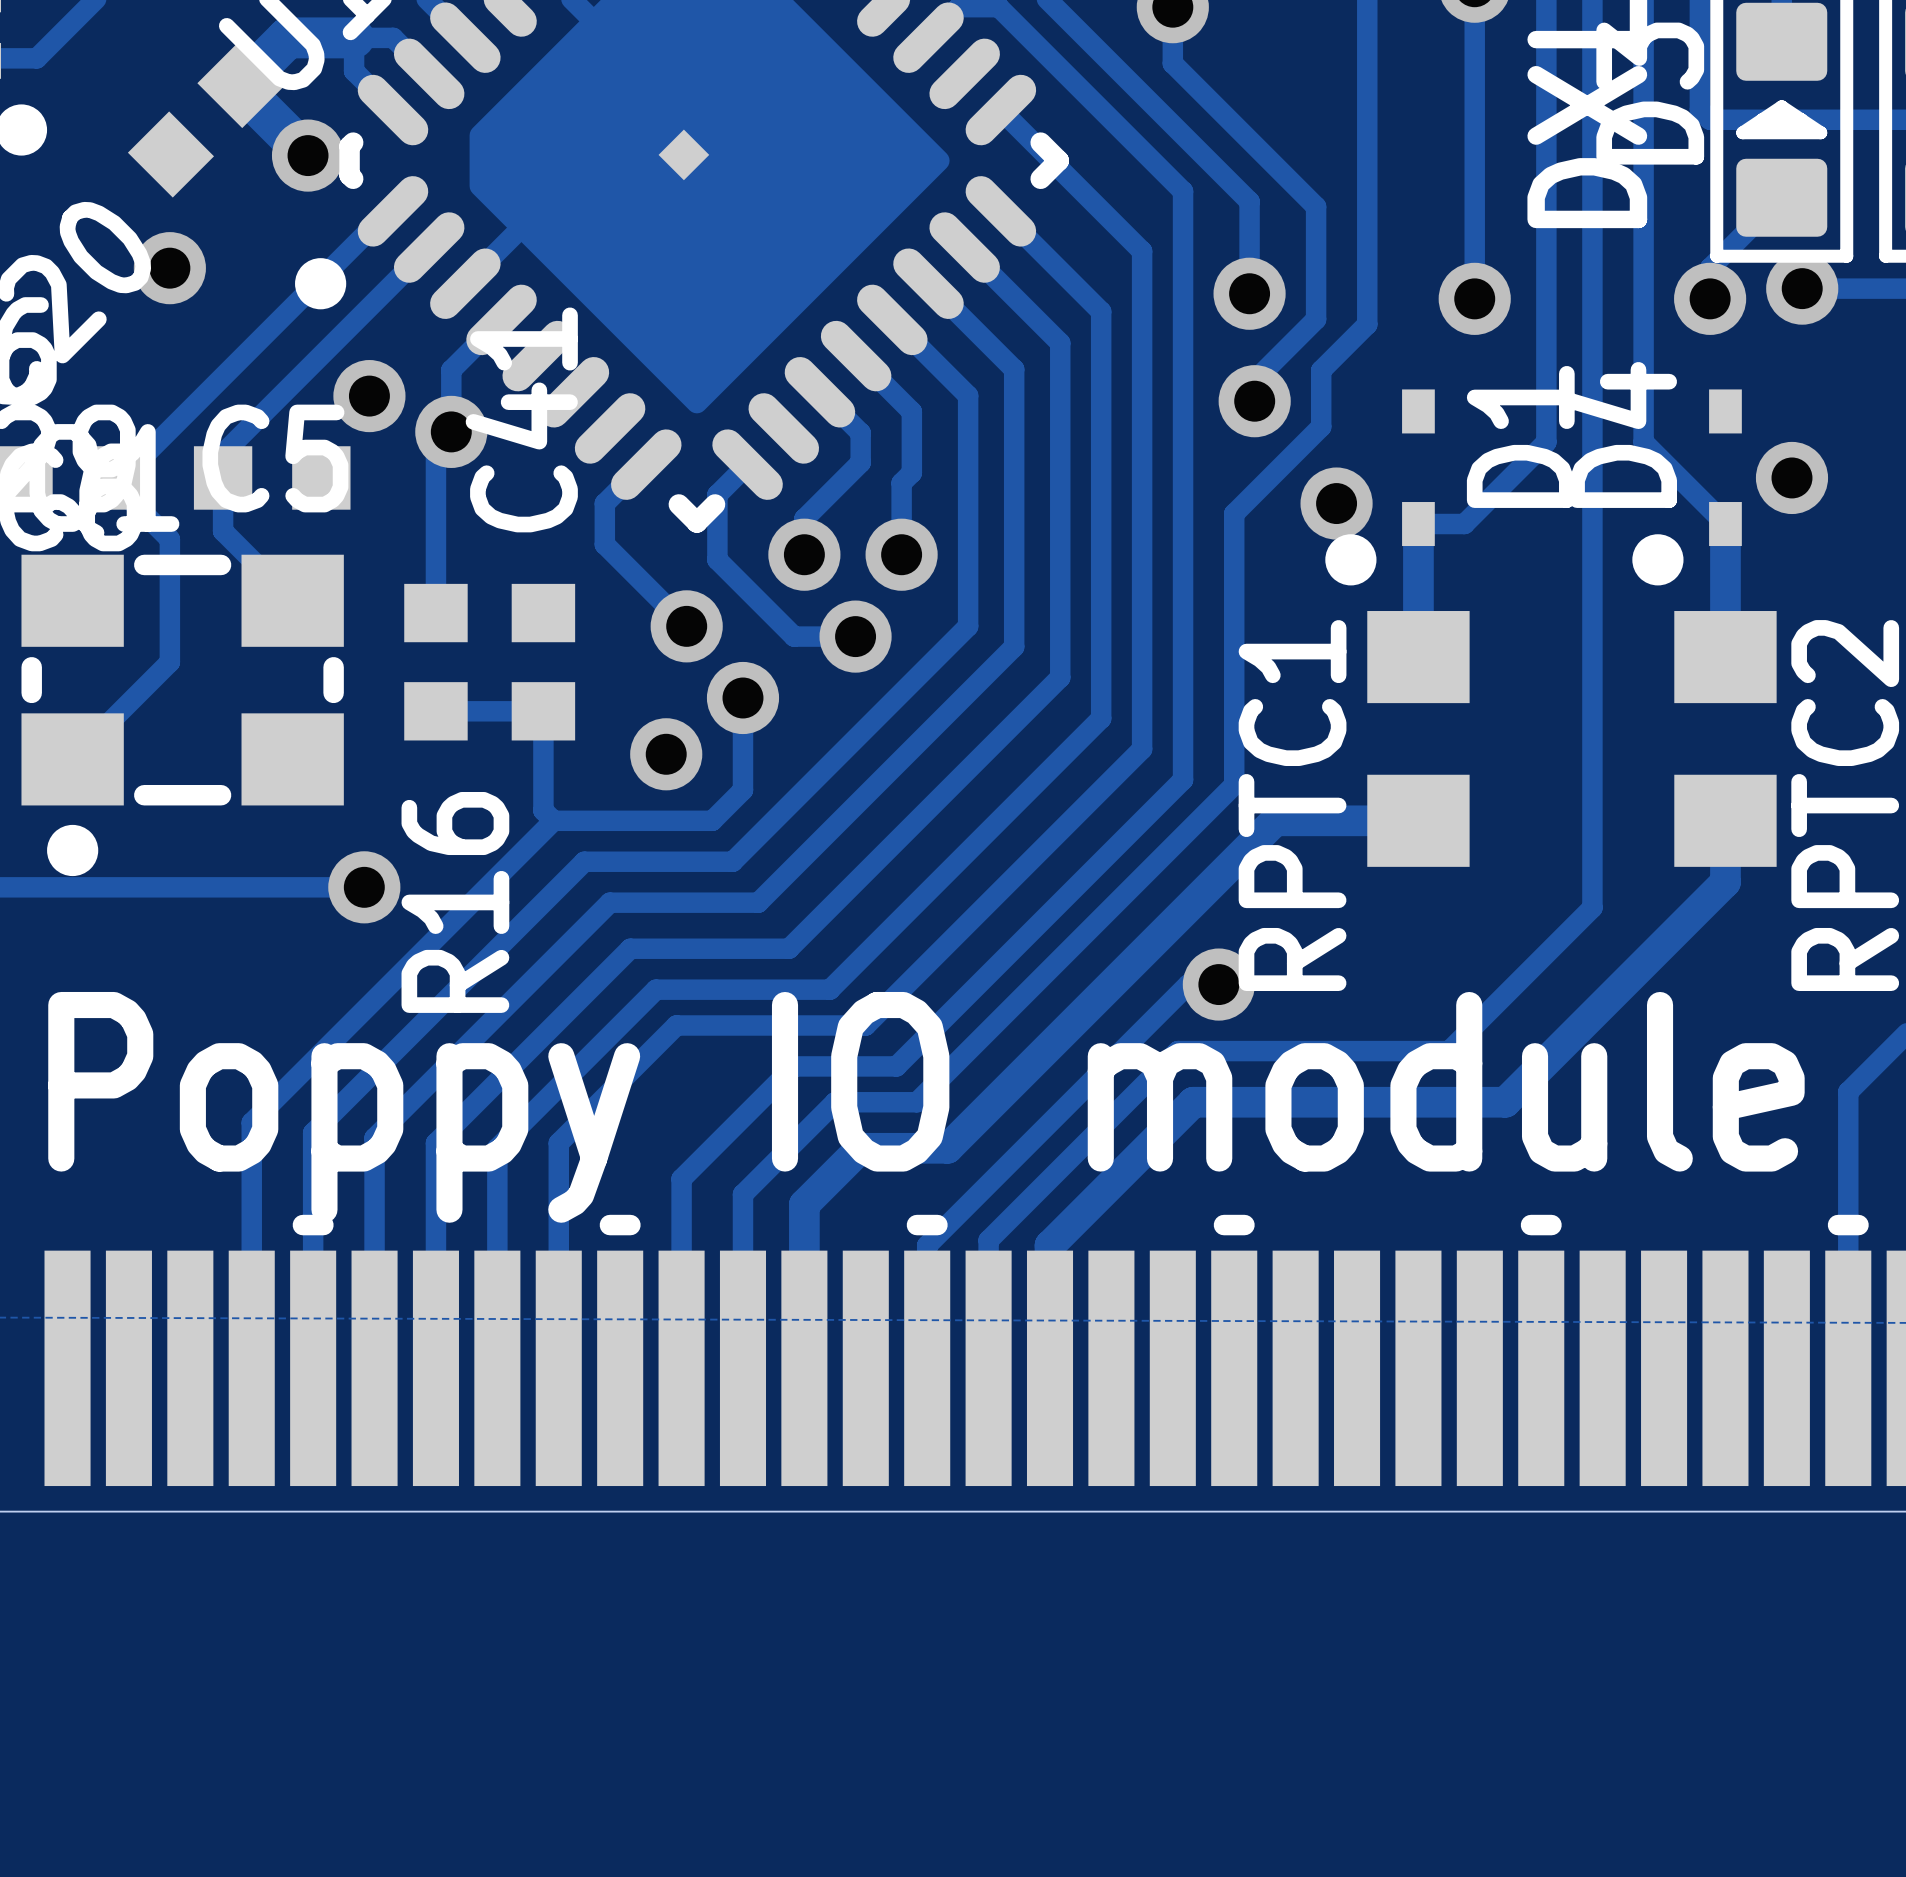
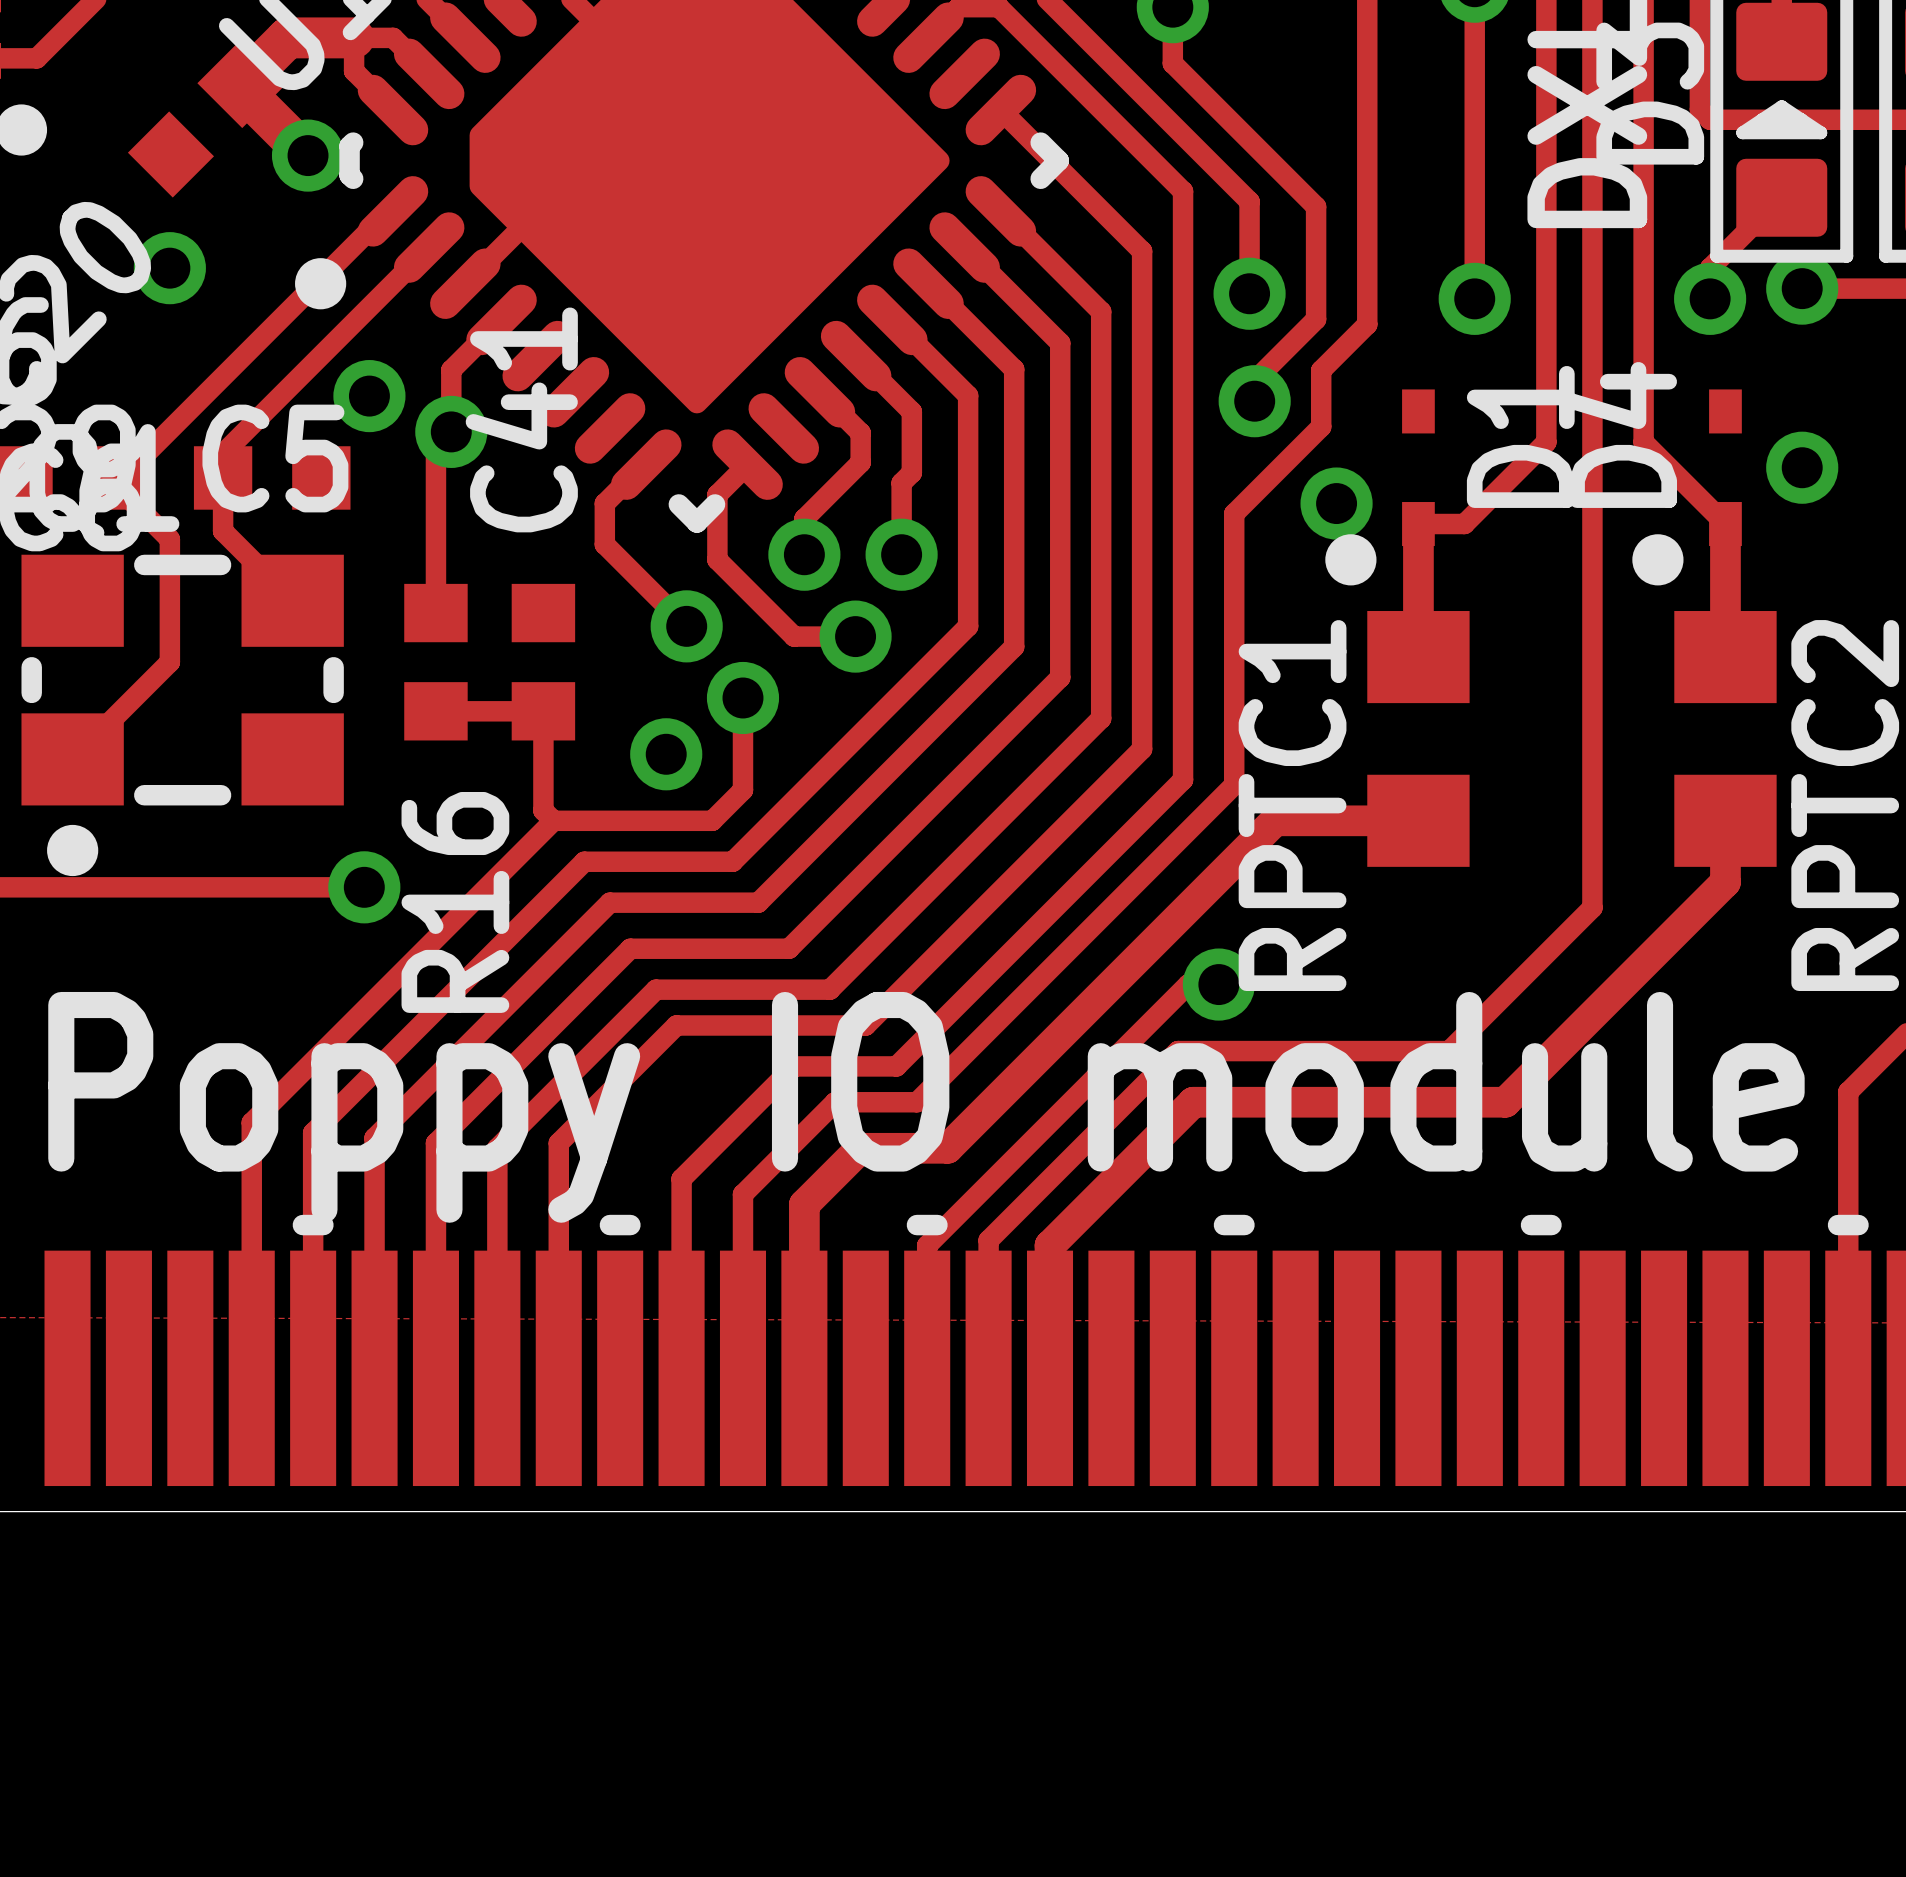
via position: (1791, 477) -> (1802, 467)

